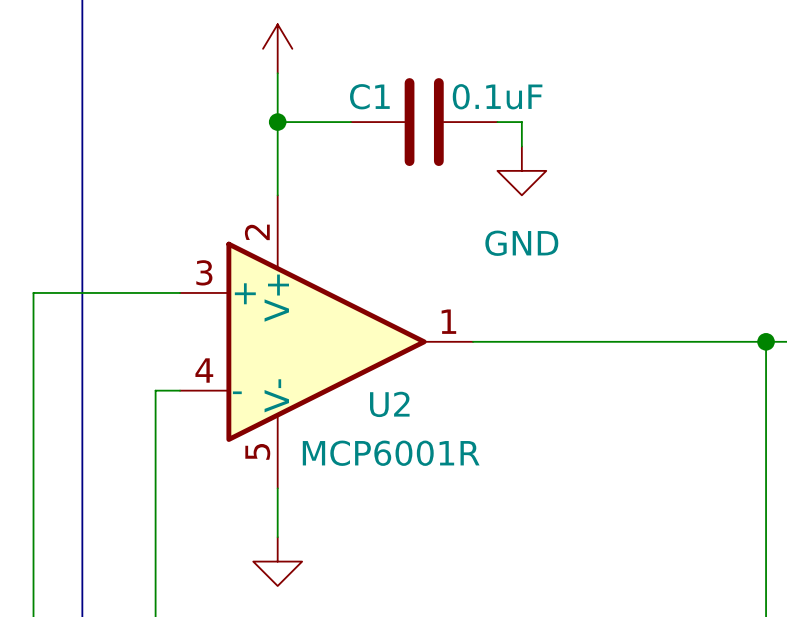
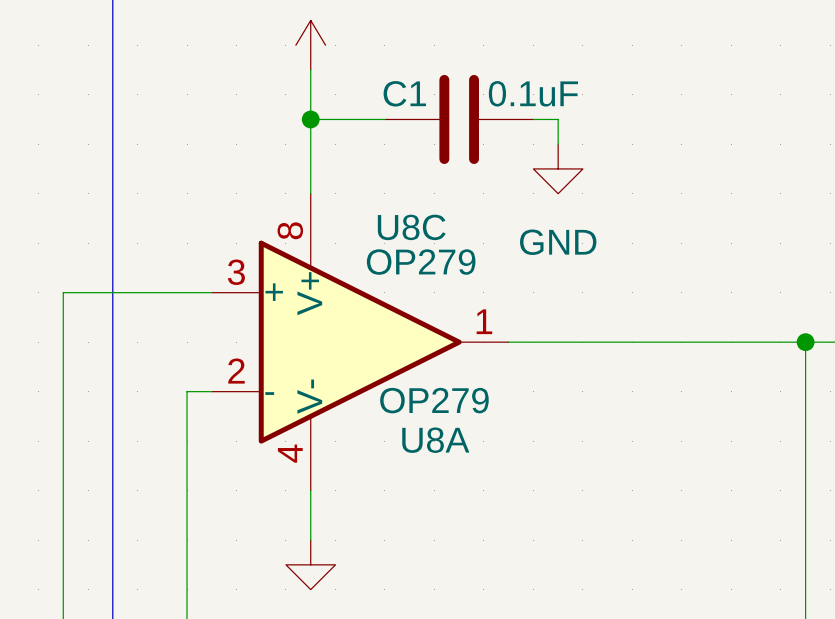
U8C: none -> OP279 (310, 342)
U2: MCP6001R (326, 341) -> none
U8A: none -> OP279 (360, 342)

